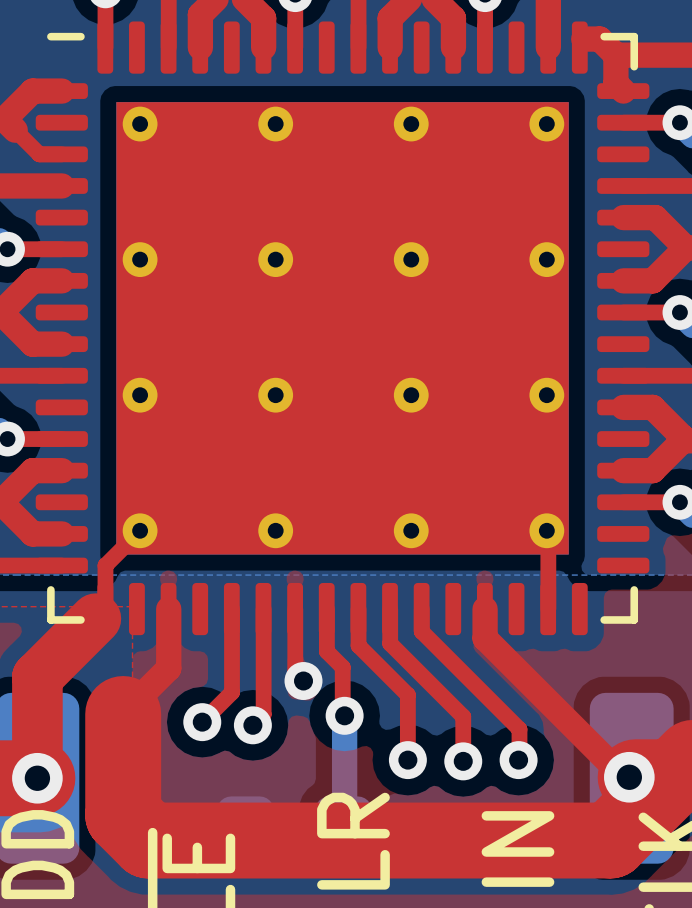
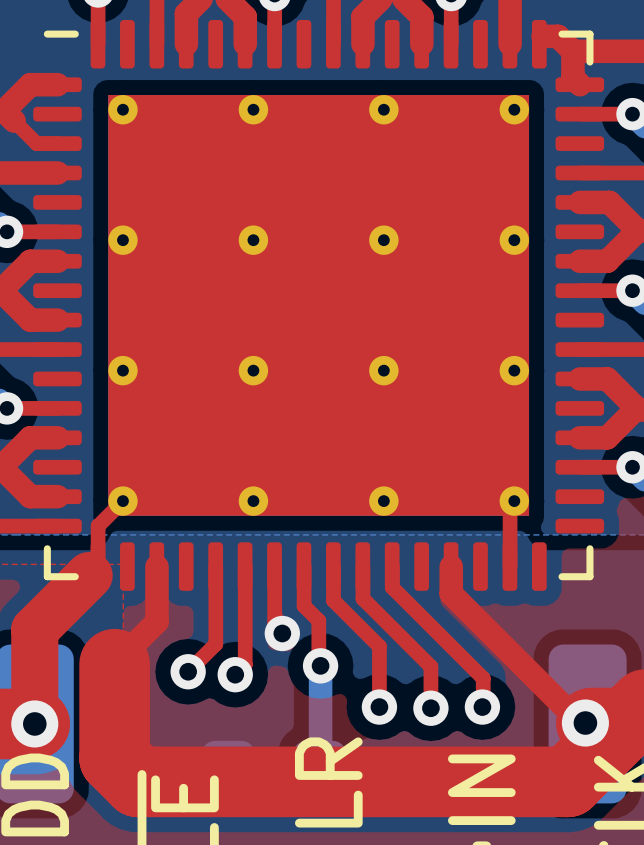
part footprint: [35, 21, 650, 636] -> [33, 19, 605, 591]

